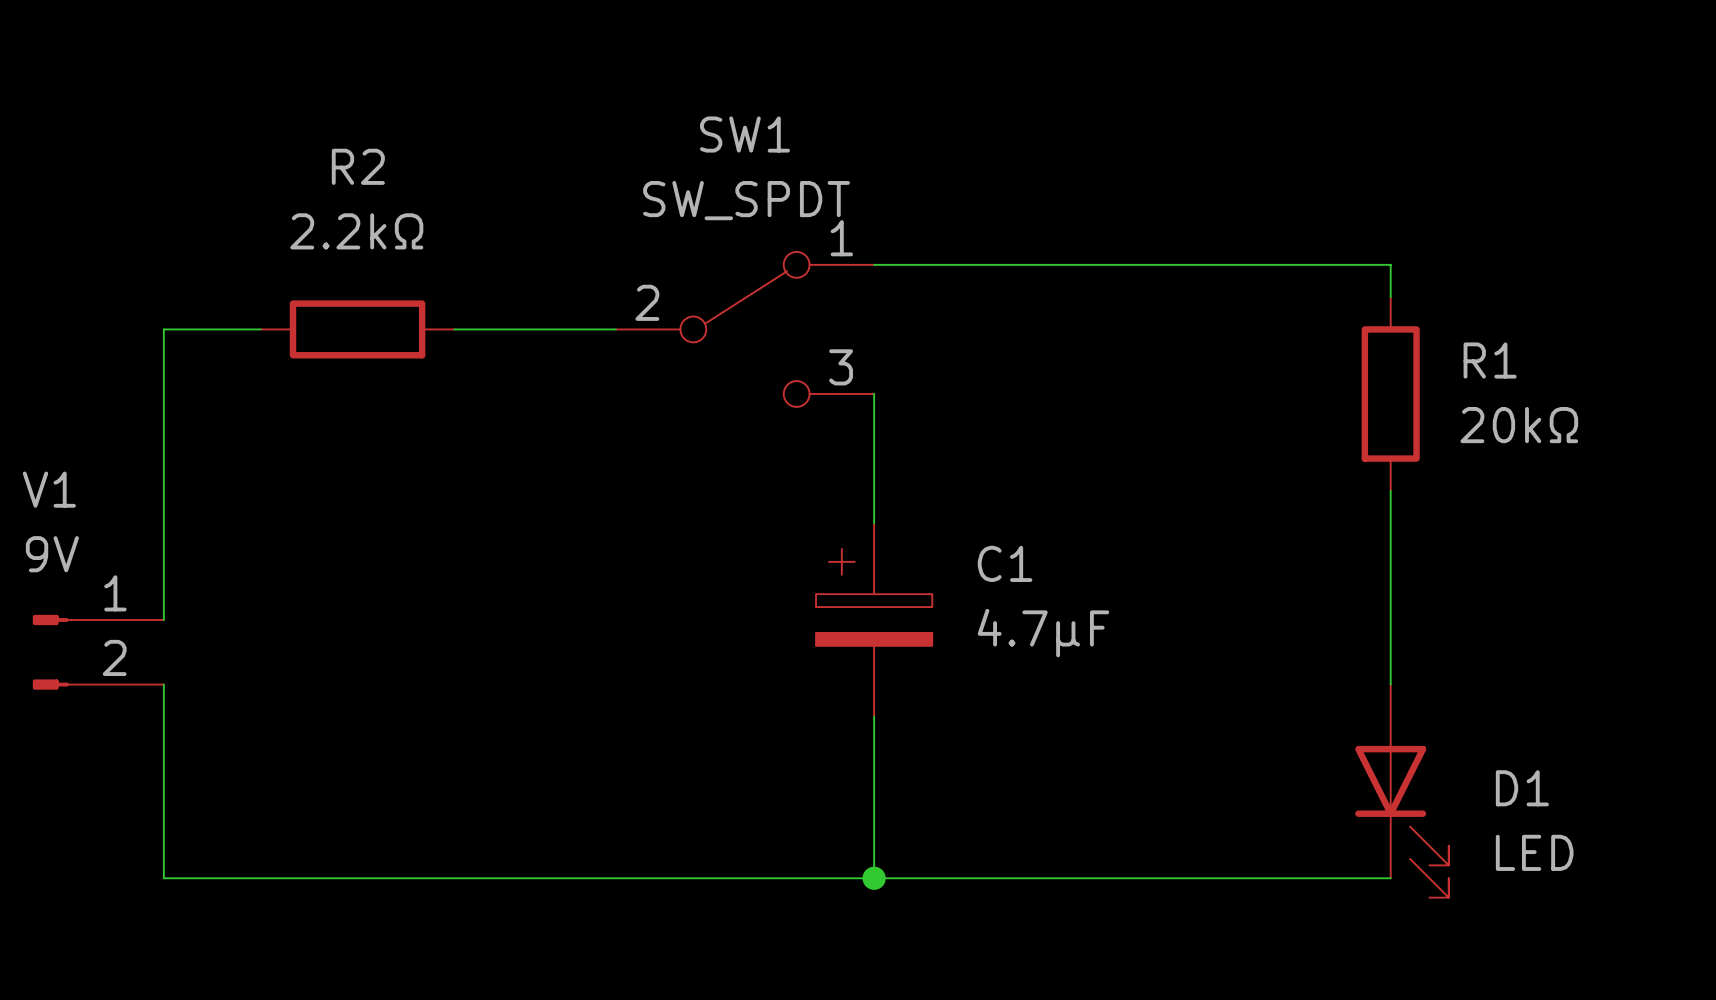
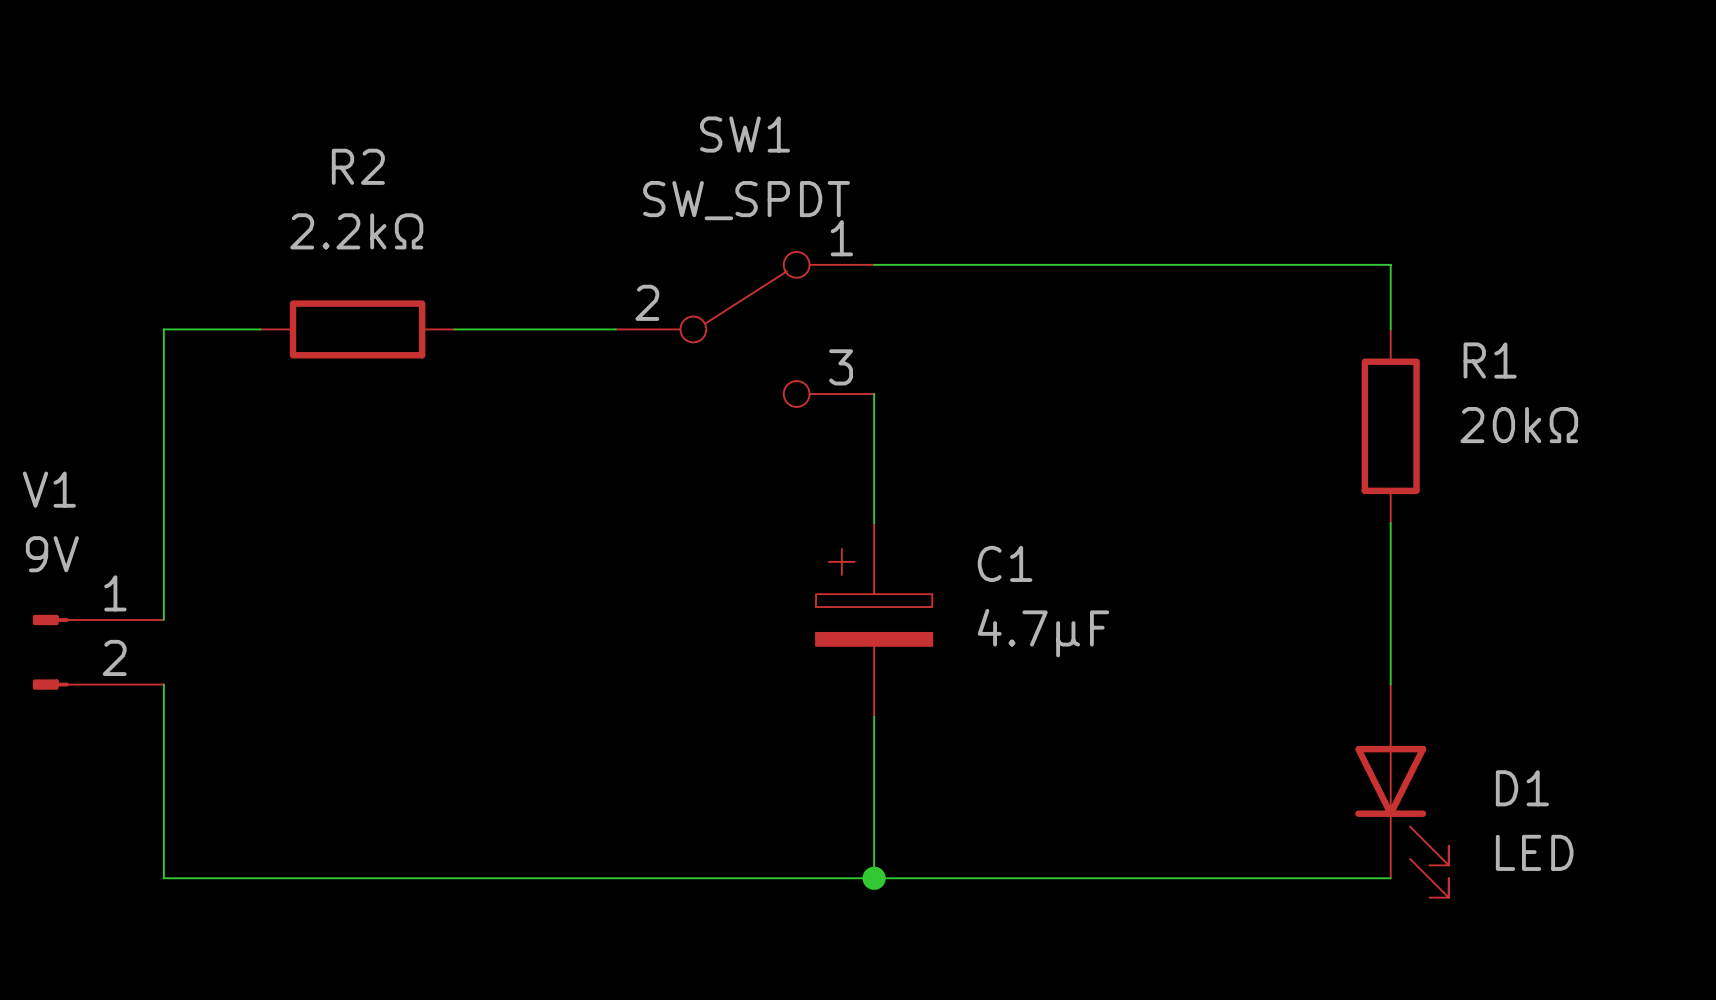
R1 position: (1390, 394) -> (1390, 426)

